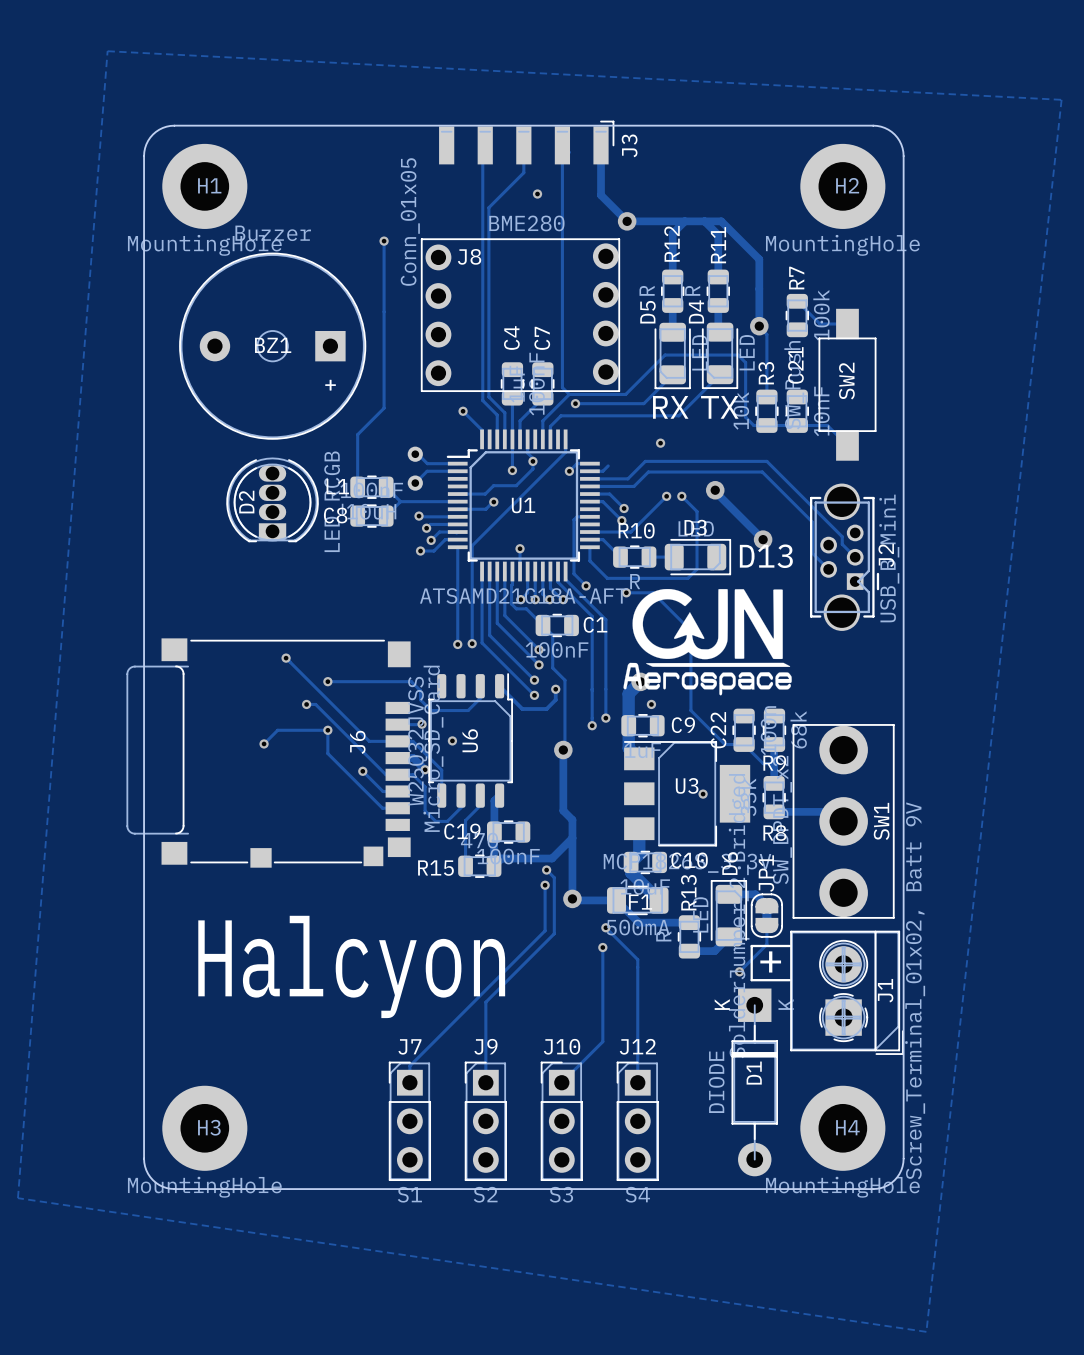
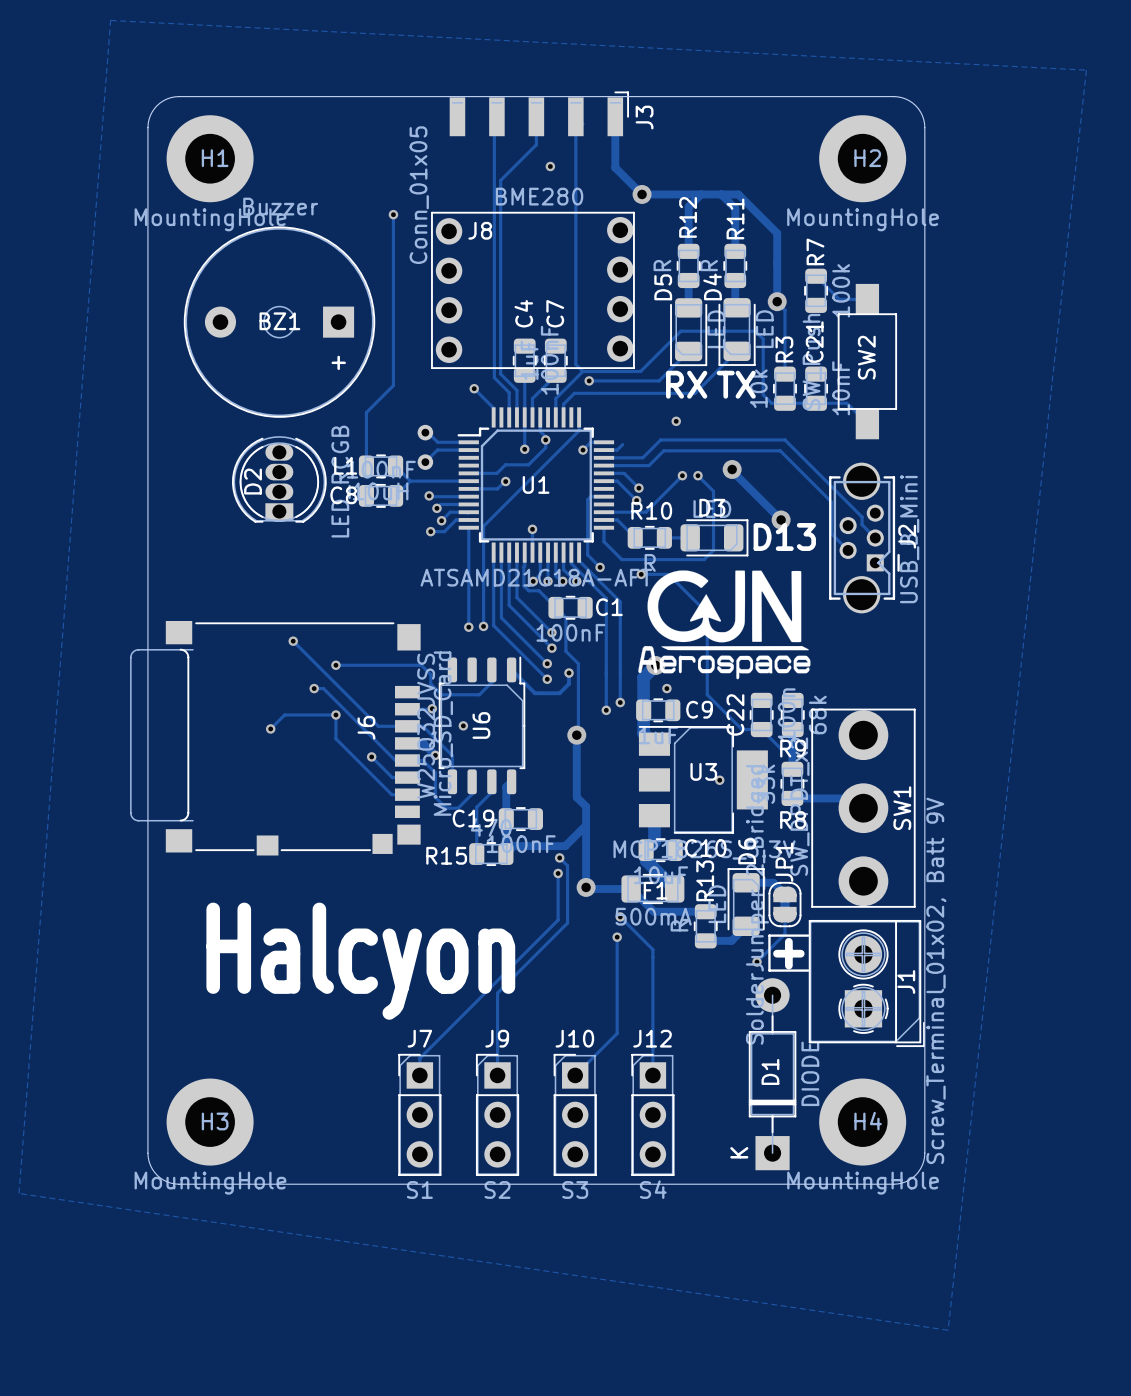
D1 footprint: [731, 988, 778, 1177] -> [748, 978, 797, 1171]
D1 value position: DIODE (716, 1082) -> DIODE (810, 1073)

